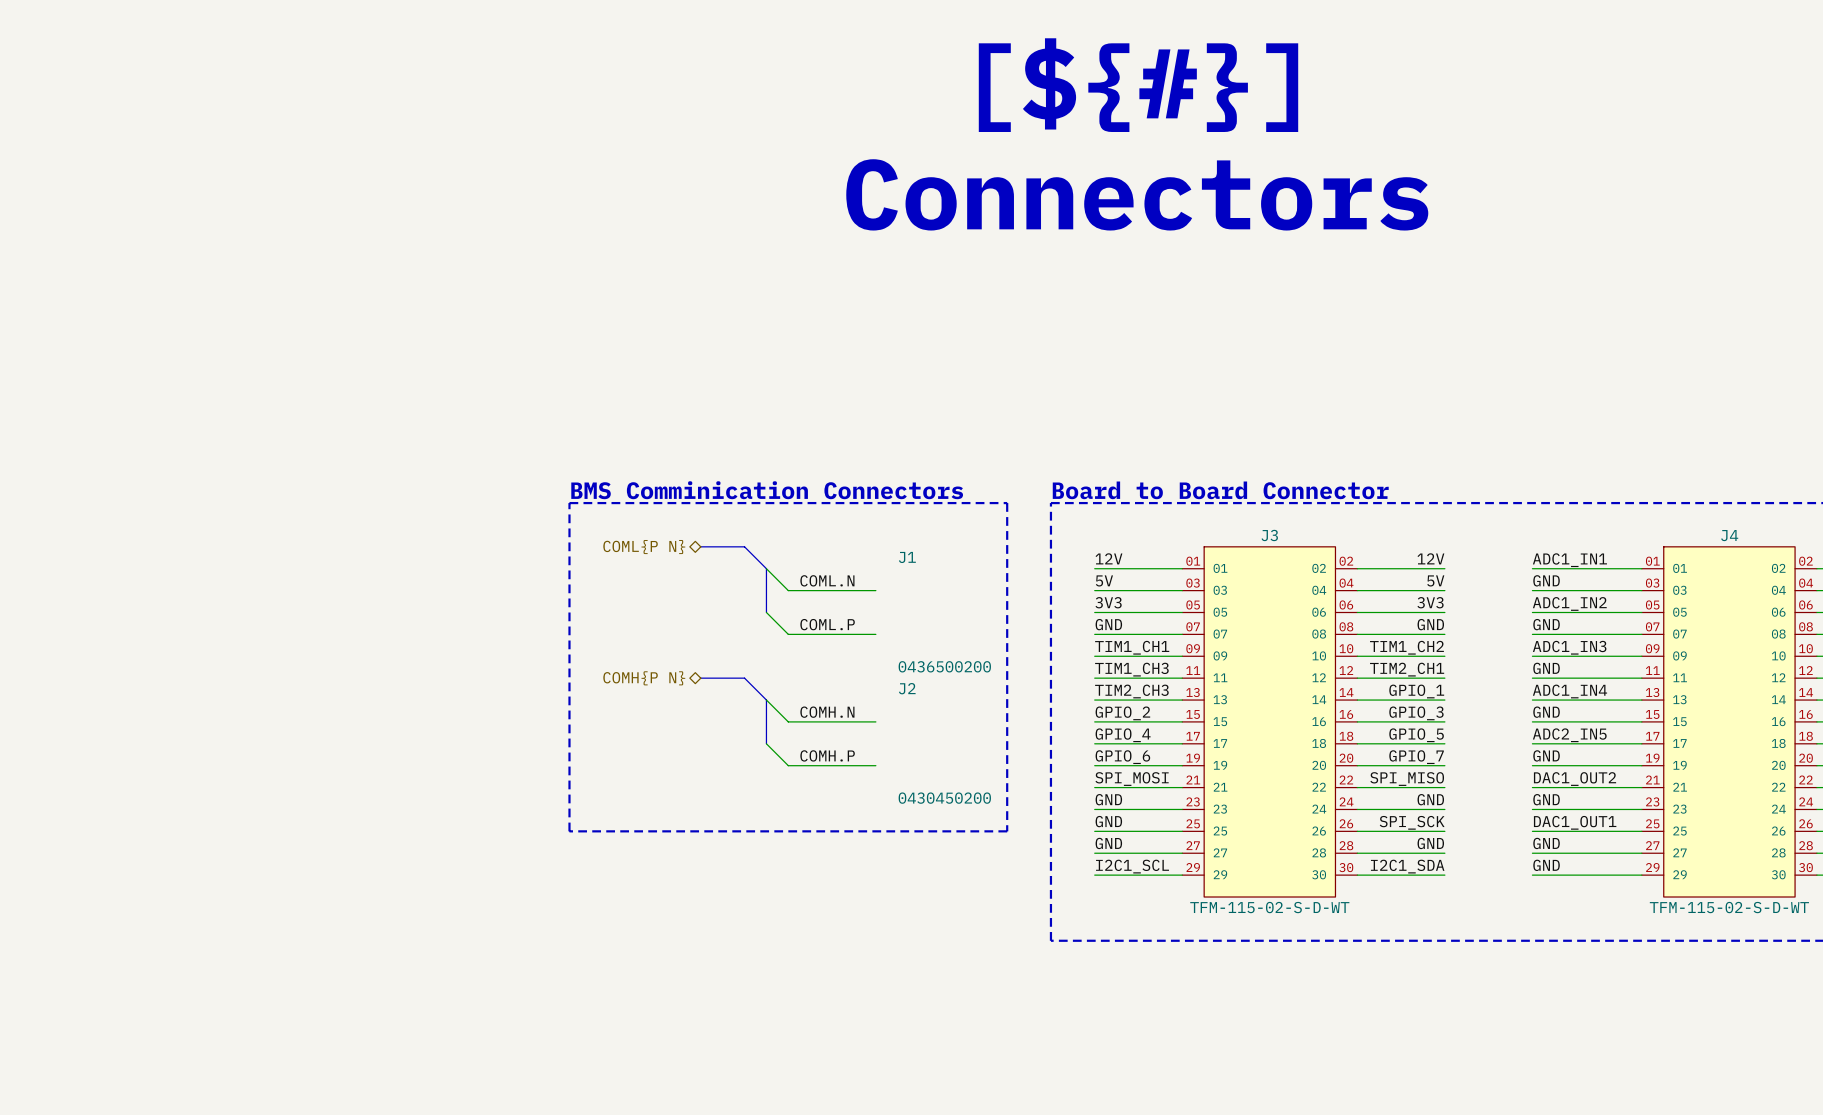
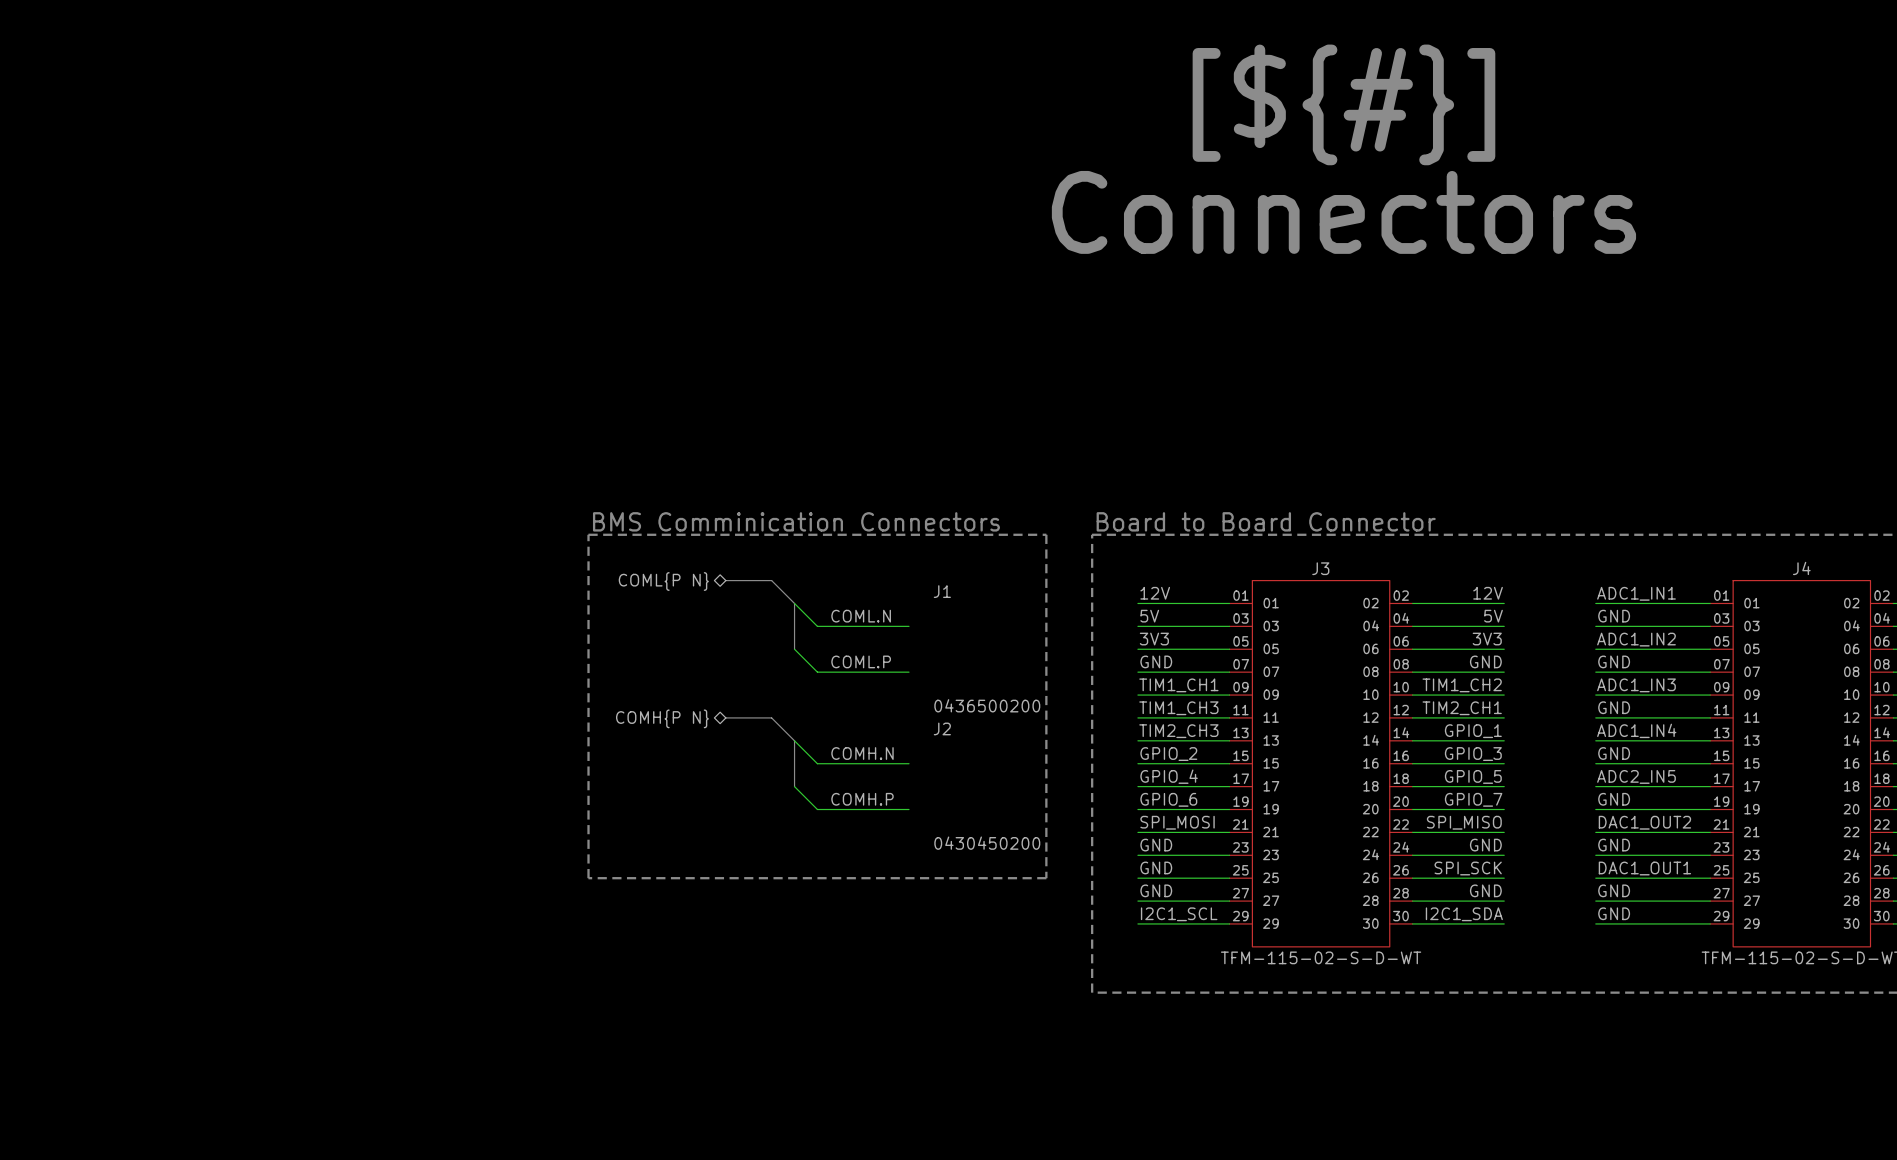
text position: [${#}] (1138, 85) -> [${#}] (1343, 104)
text position: Connectors (1137, 194) -> Connectors (1343, 212)

